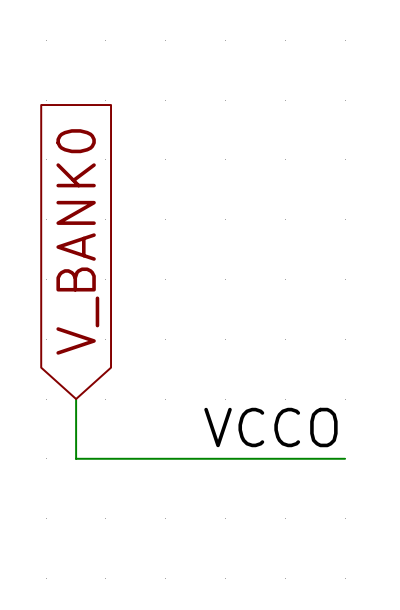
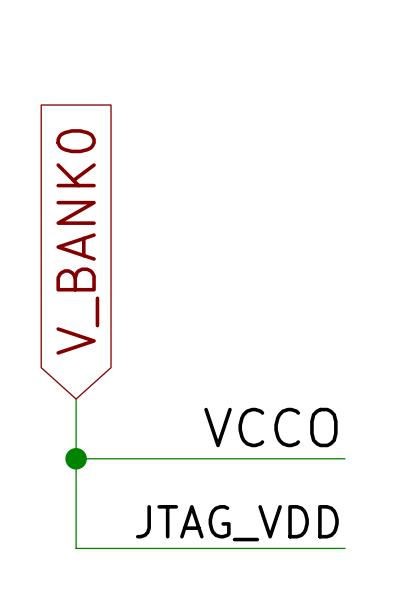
wire: none -> (76, 458) (76, 548) (345, 548)
junction: none -> (76, 458)
label: none -> JTAG_VDD (237, 523)

